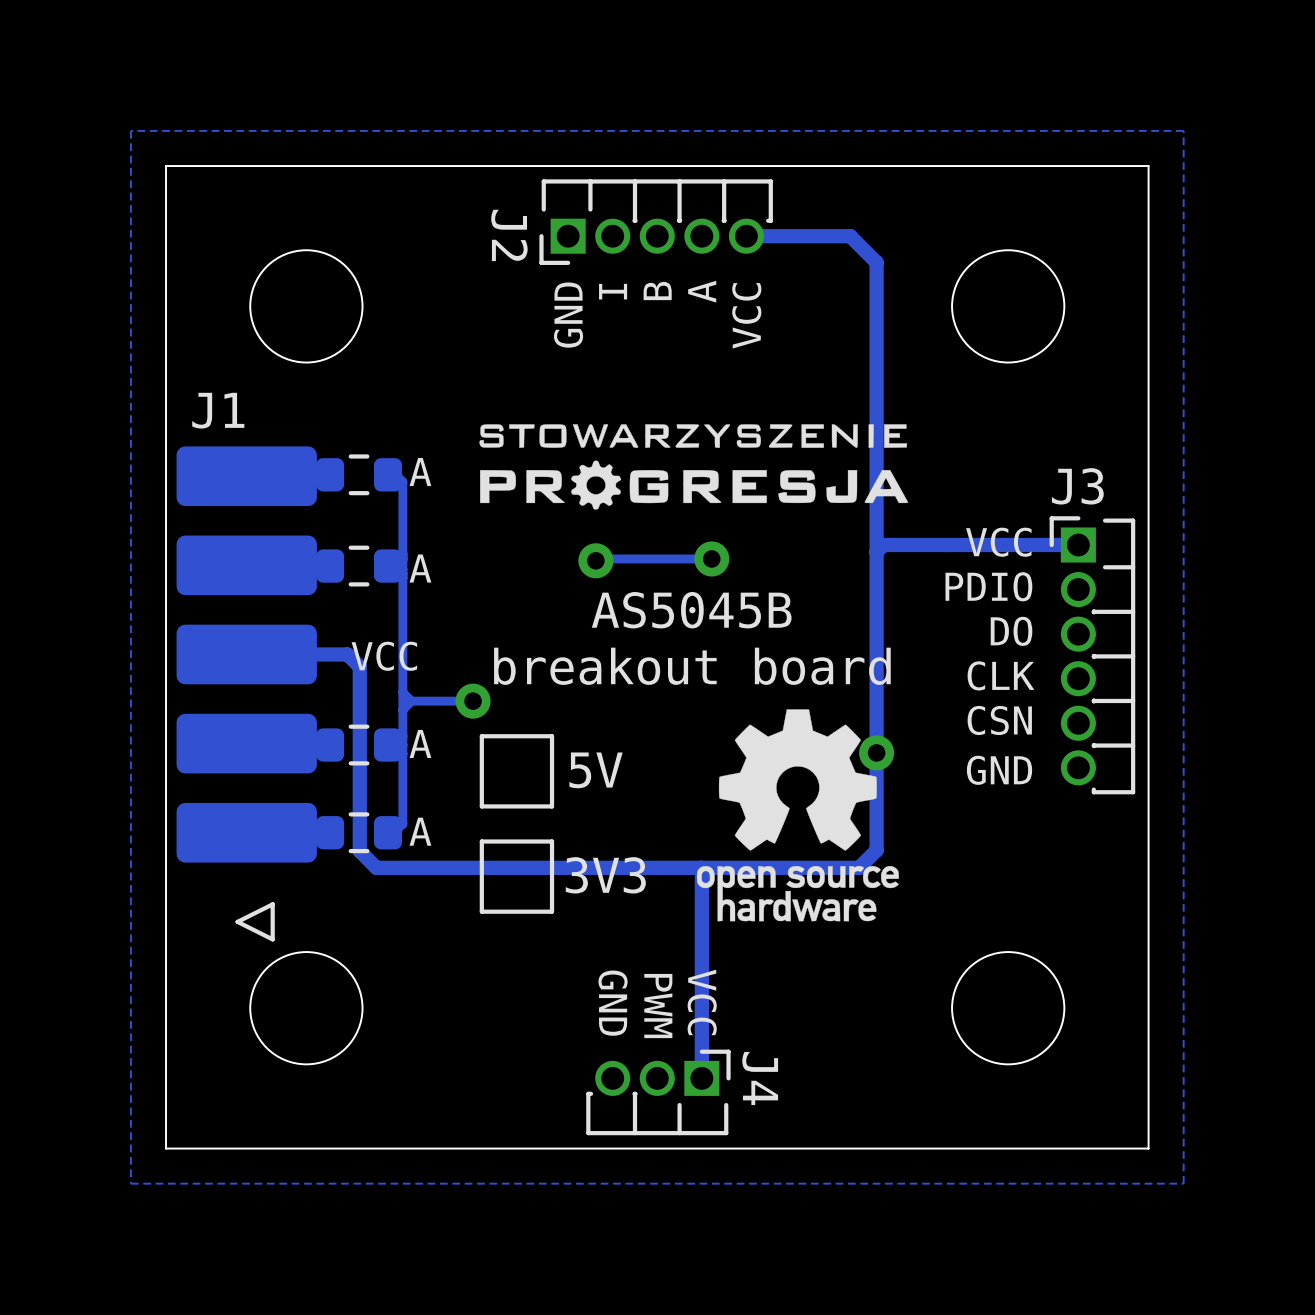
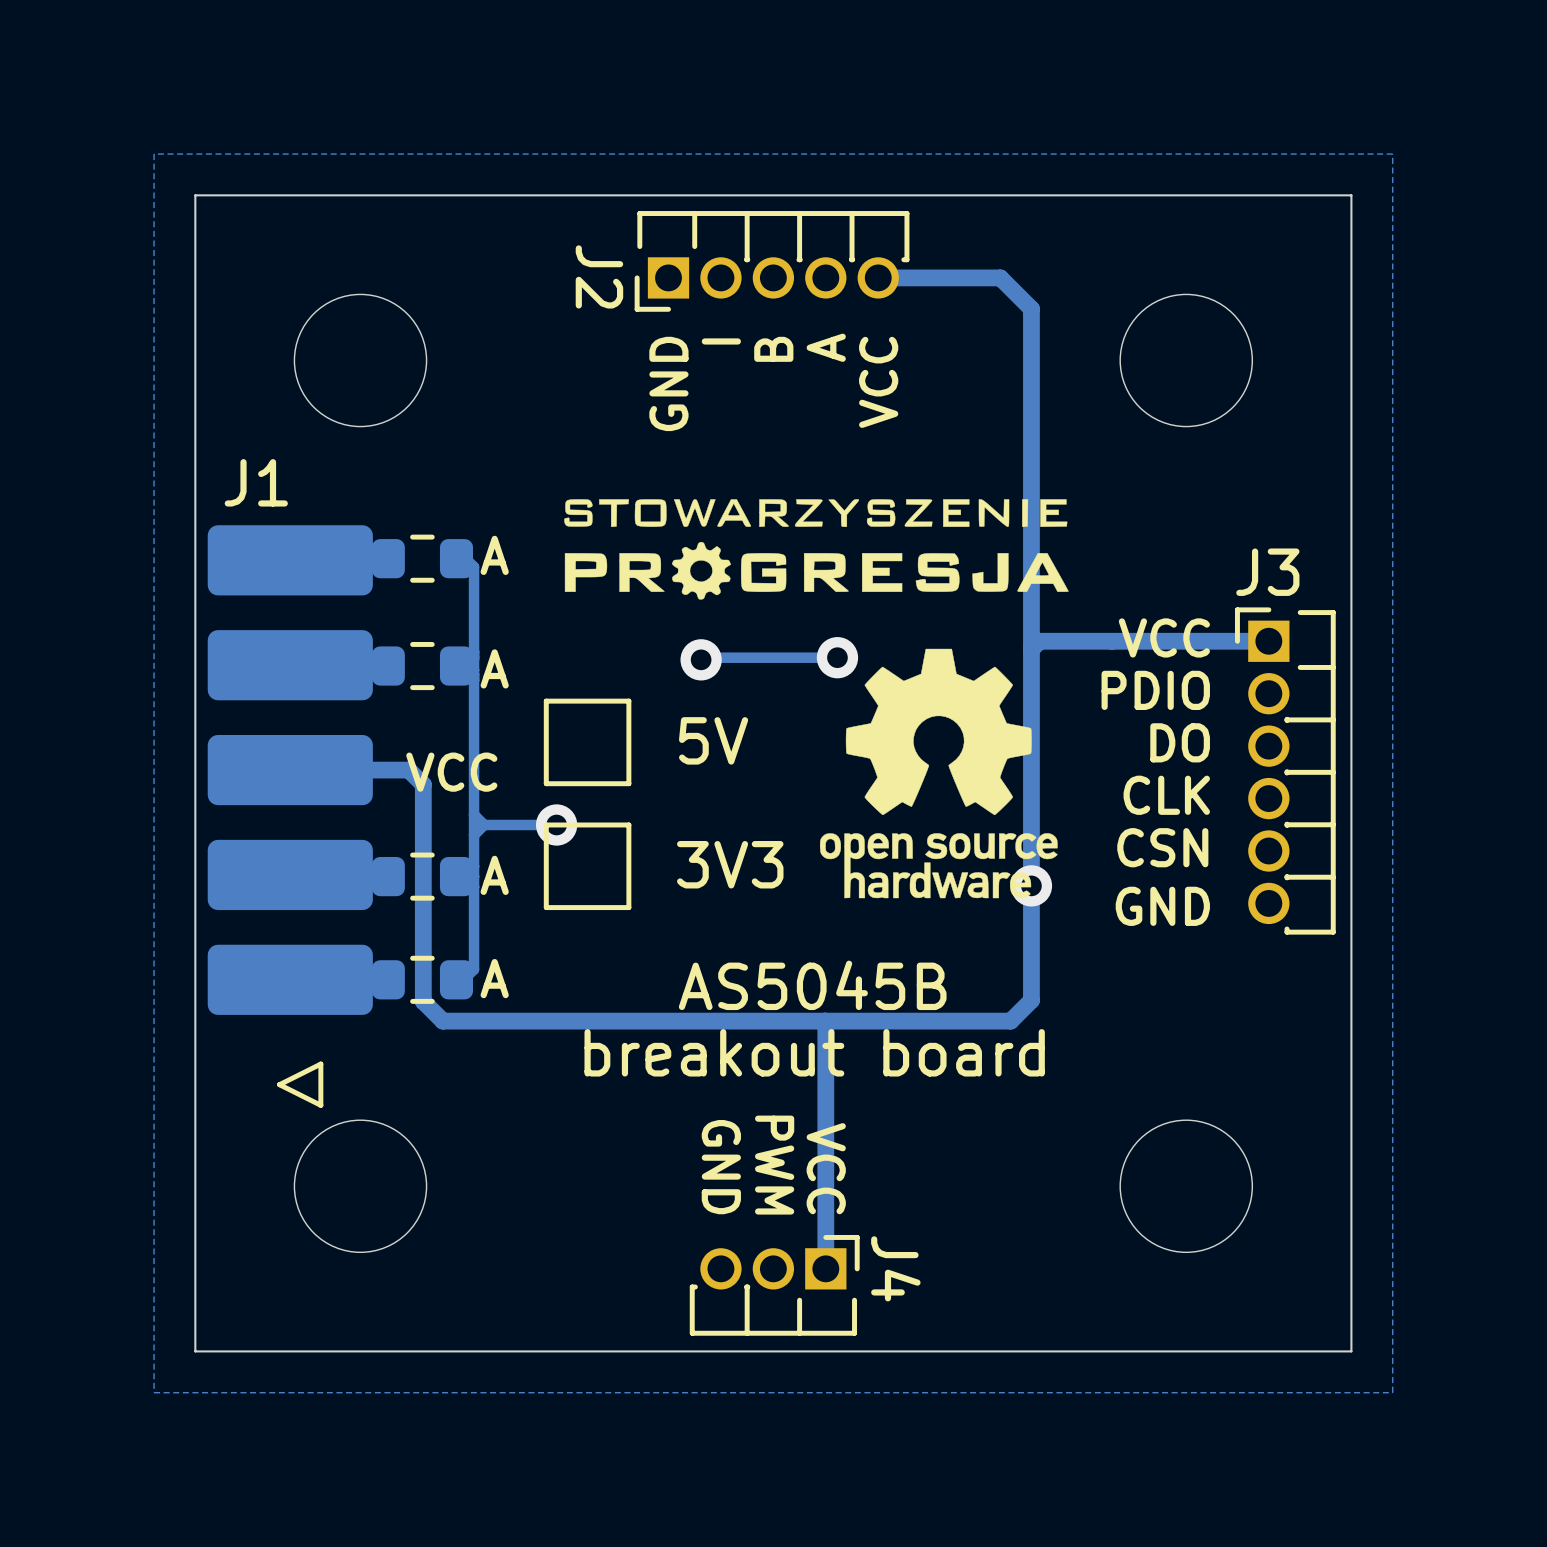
text position: AS5045B (691, 610) -> AS5045B (812, 985)
text position: breakout board (692, 666) -> breakout board (814, 1052)
line: (552, 736) (552, 806) (481, 806) (481, 736) (552, 736) -> (628, 824) (628, 907) (546, 907) (546, 824) (628, 824)
text position: 5V (596, 770) -> 5V (713, 740)
drawing position: (797, 815) -> (938, 773)
line: (552, 841) (552, 911) (481, 911) (481, 841) (552, 841) -> (628, 701) (628, 783) (546, 783) (546, 701) (628, 701)
text position: 3V3 (605, 875) -> 3V3 (730, 864)

